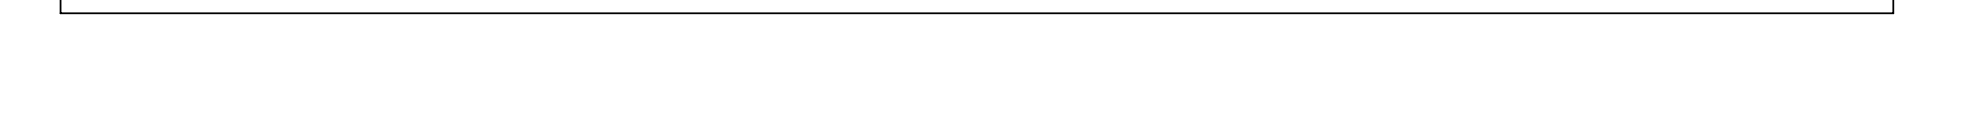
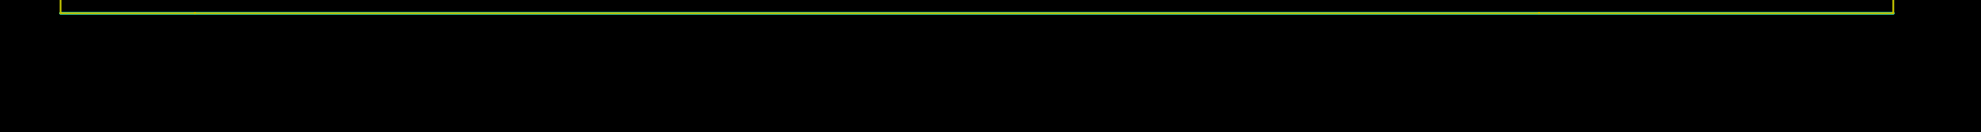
line: none -> (60, 13) (1893, 13)

